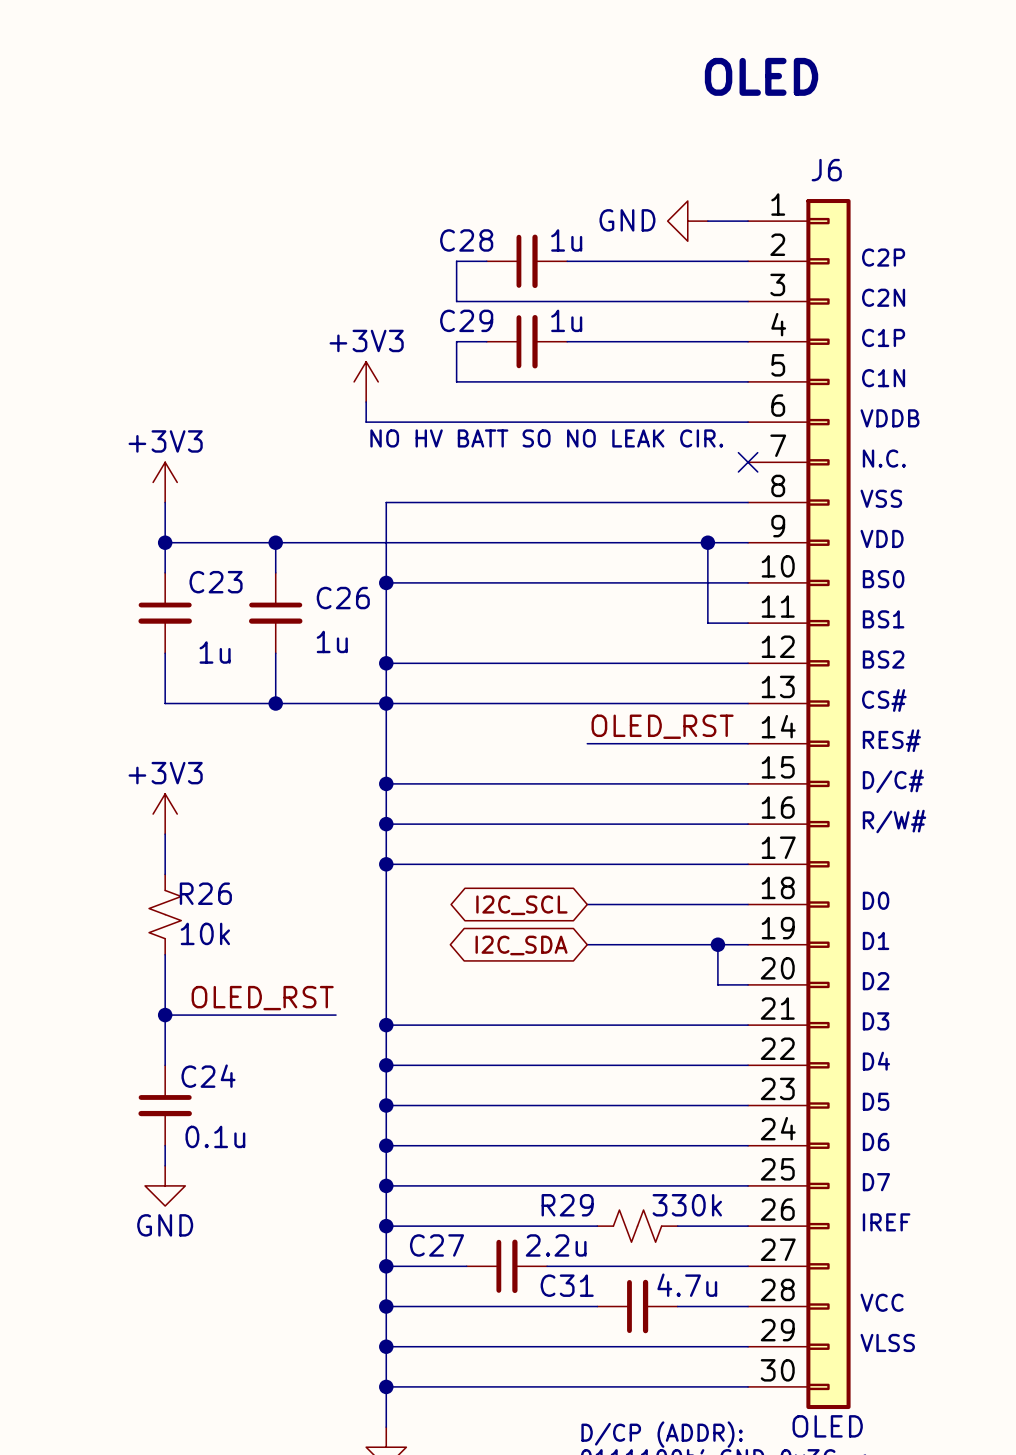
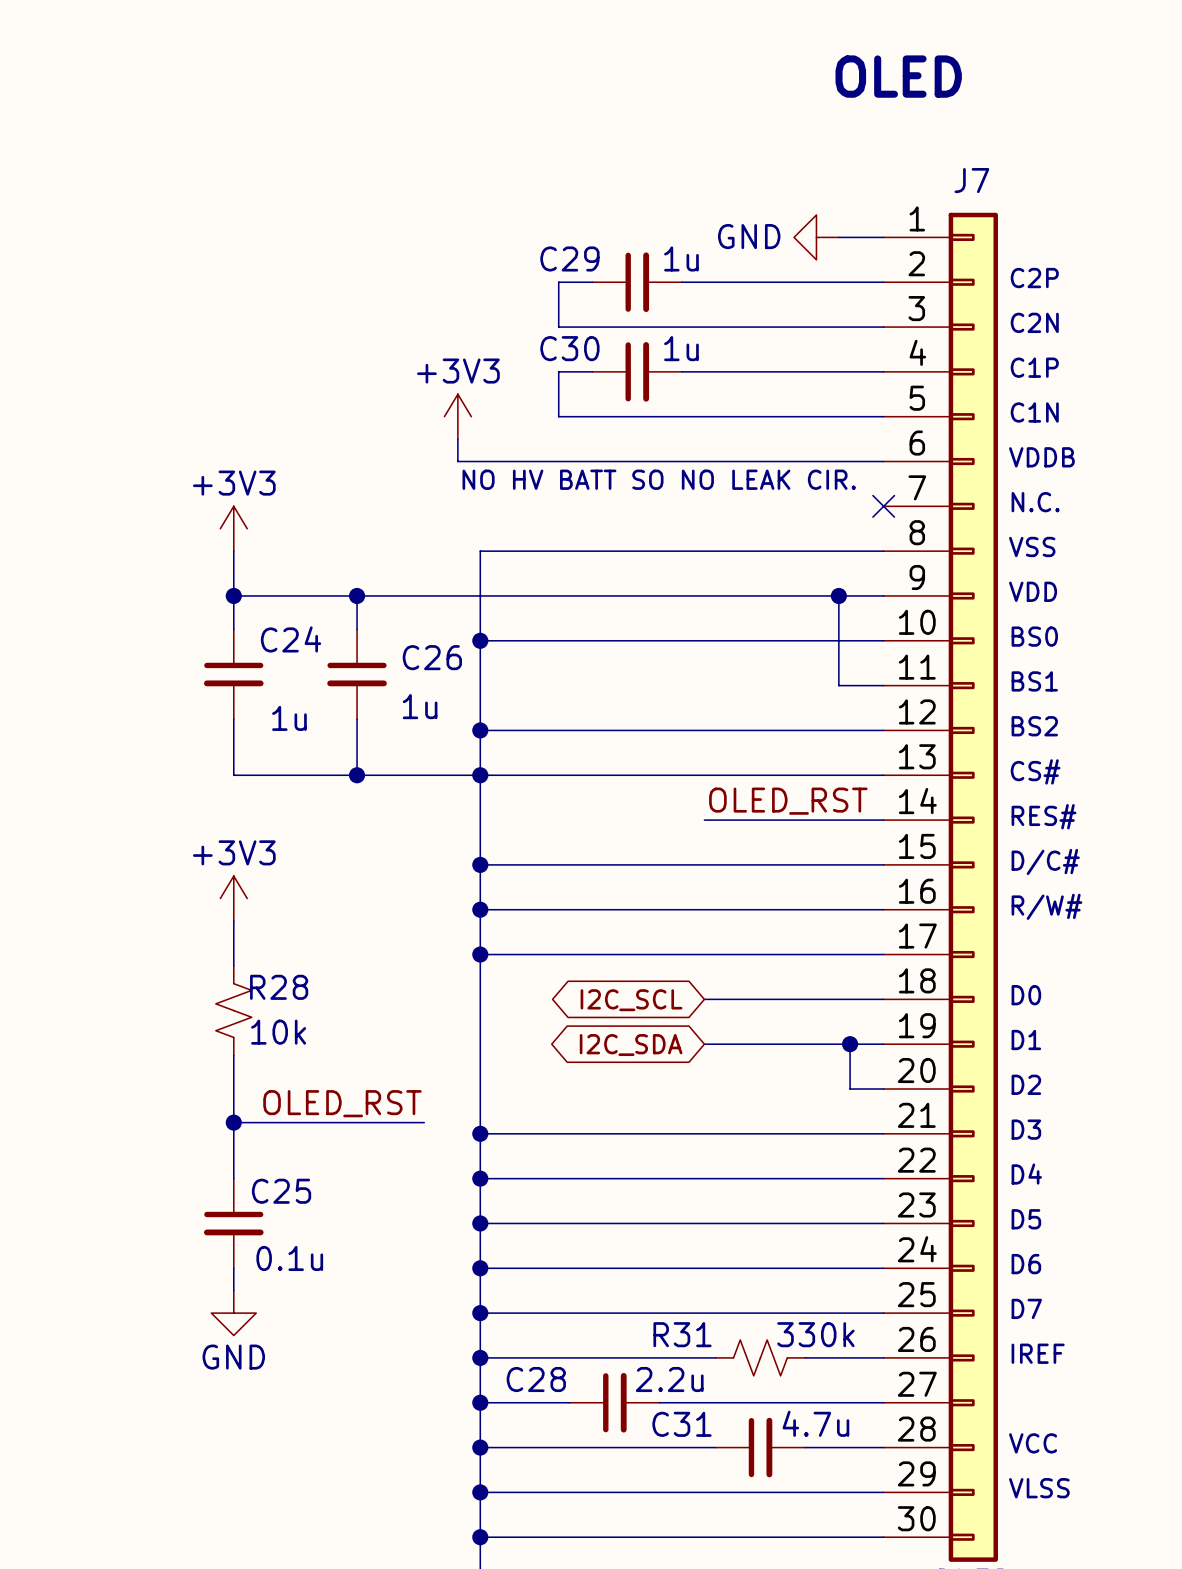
J6 name: J6 (826, 170) -> J7 (971, 180)
C28 name: C28 (466, 240) -> C29 (569, 258)
C29 name: C29 (466, 320) -> C30 (569, 348)
C23 name: C23 (216, 582) -> C24 (291, 639)
R26 name: R26 (205, 893) -> R28 (279, 987)
C24 name: C24 (208, 1076) -> C25 (281, 1191)
R29 name: R29 (567, 1205) -> R31 (682, 1334)
C27 name: C27 (437, 1245) -> C28 (536, 1379)

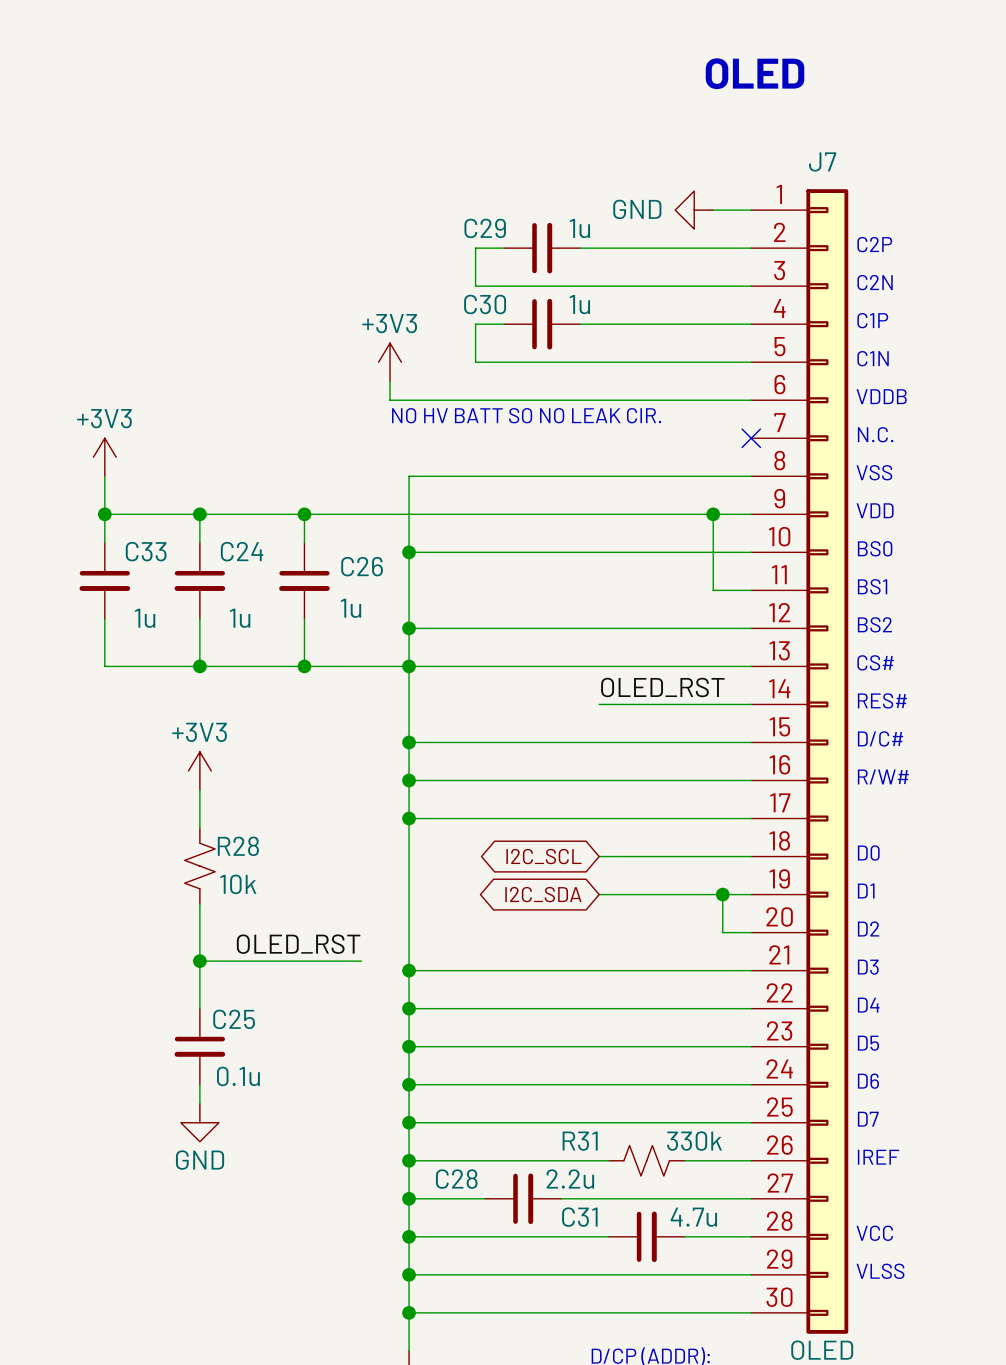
power symbol position: +3V3 (233, 528) -> +3V3 (104, 457)
wire: none -> (104, 476) (104, 542)
wire: (233, 551) (233, 595) -> (104, 514) (199, 514)
junction: none -> (104, 514)
C33: none -> 1u (104, 580)
wire: none -> (104, 618) (104, 666) (199, 666)
junction: none -> (199, 666)

